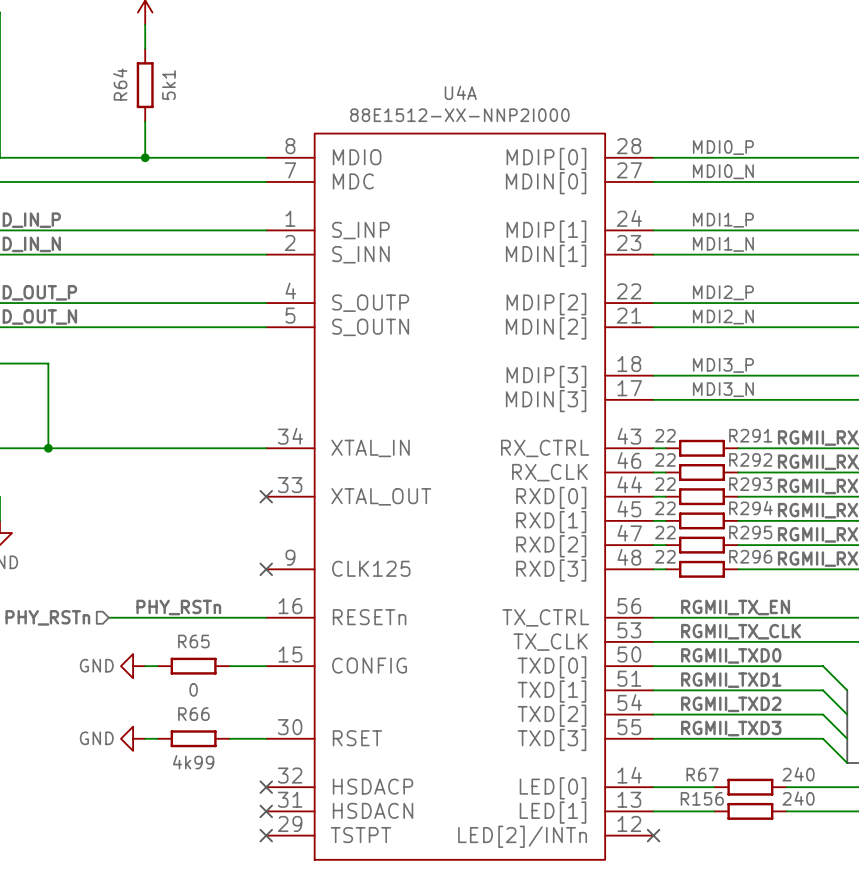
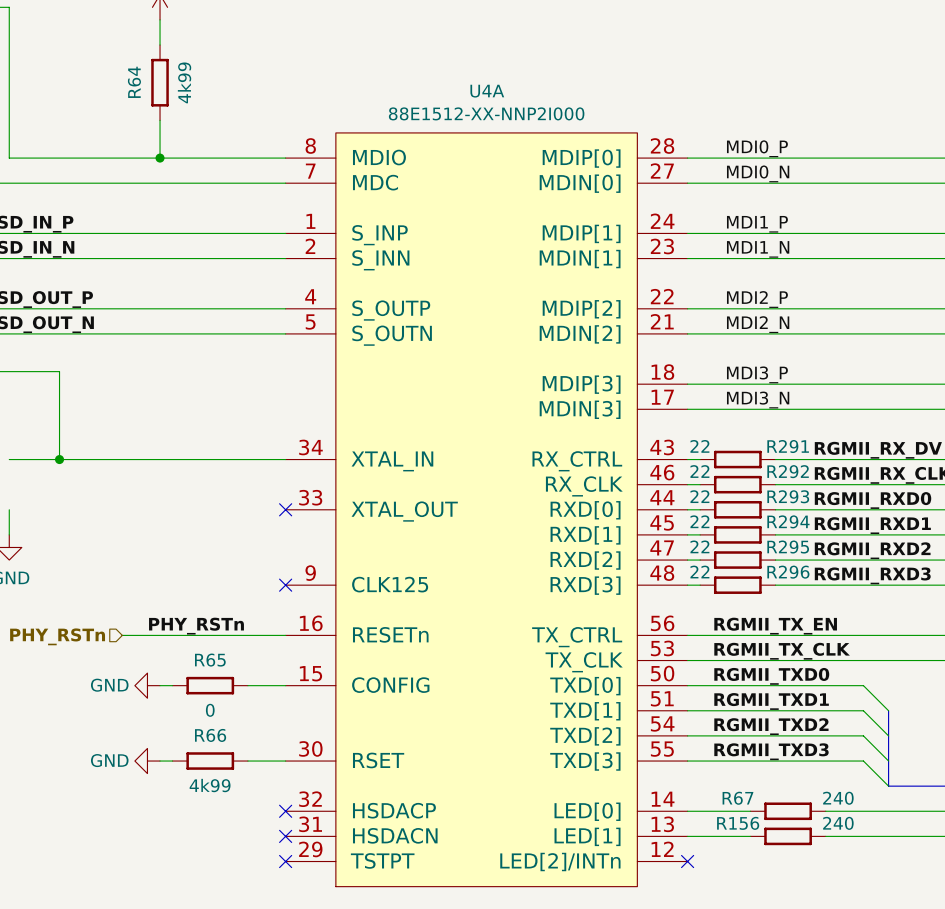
R64 text: 5k1 (168, 85) -> 4k99 (184, 82)

